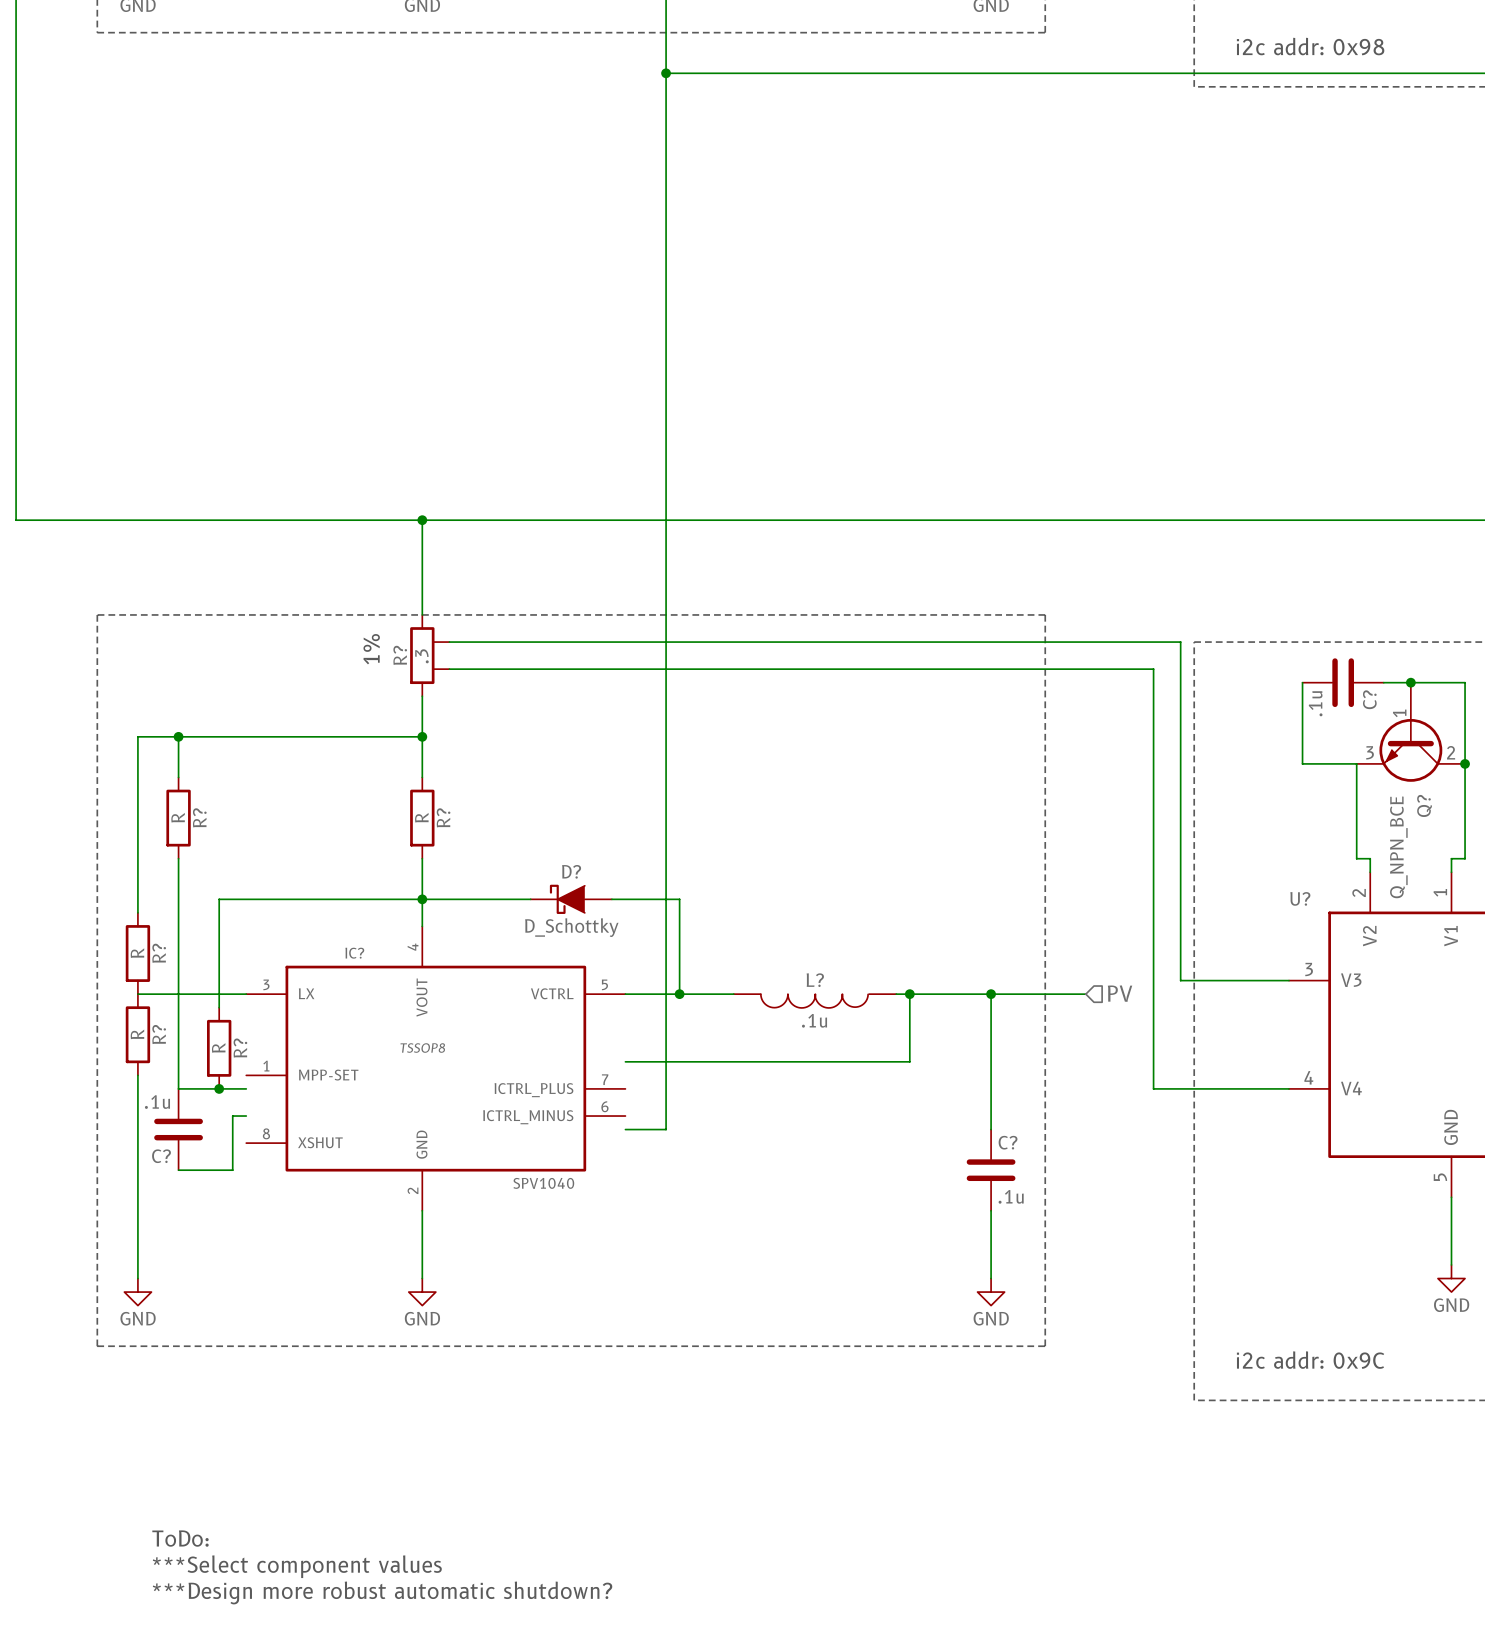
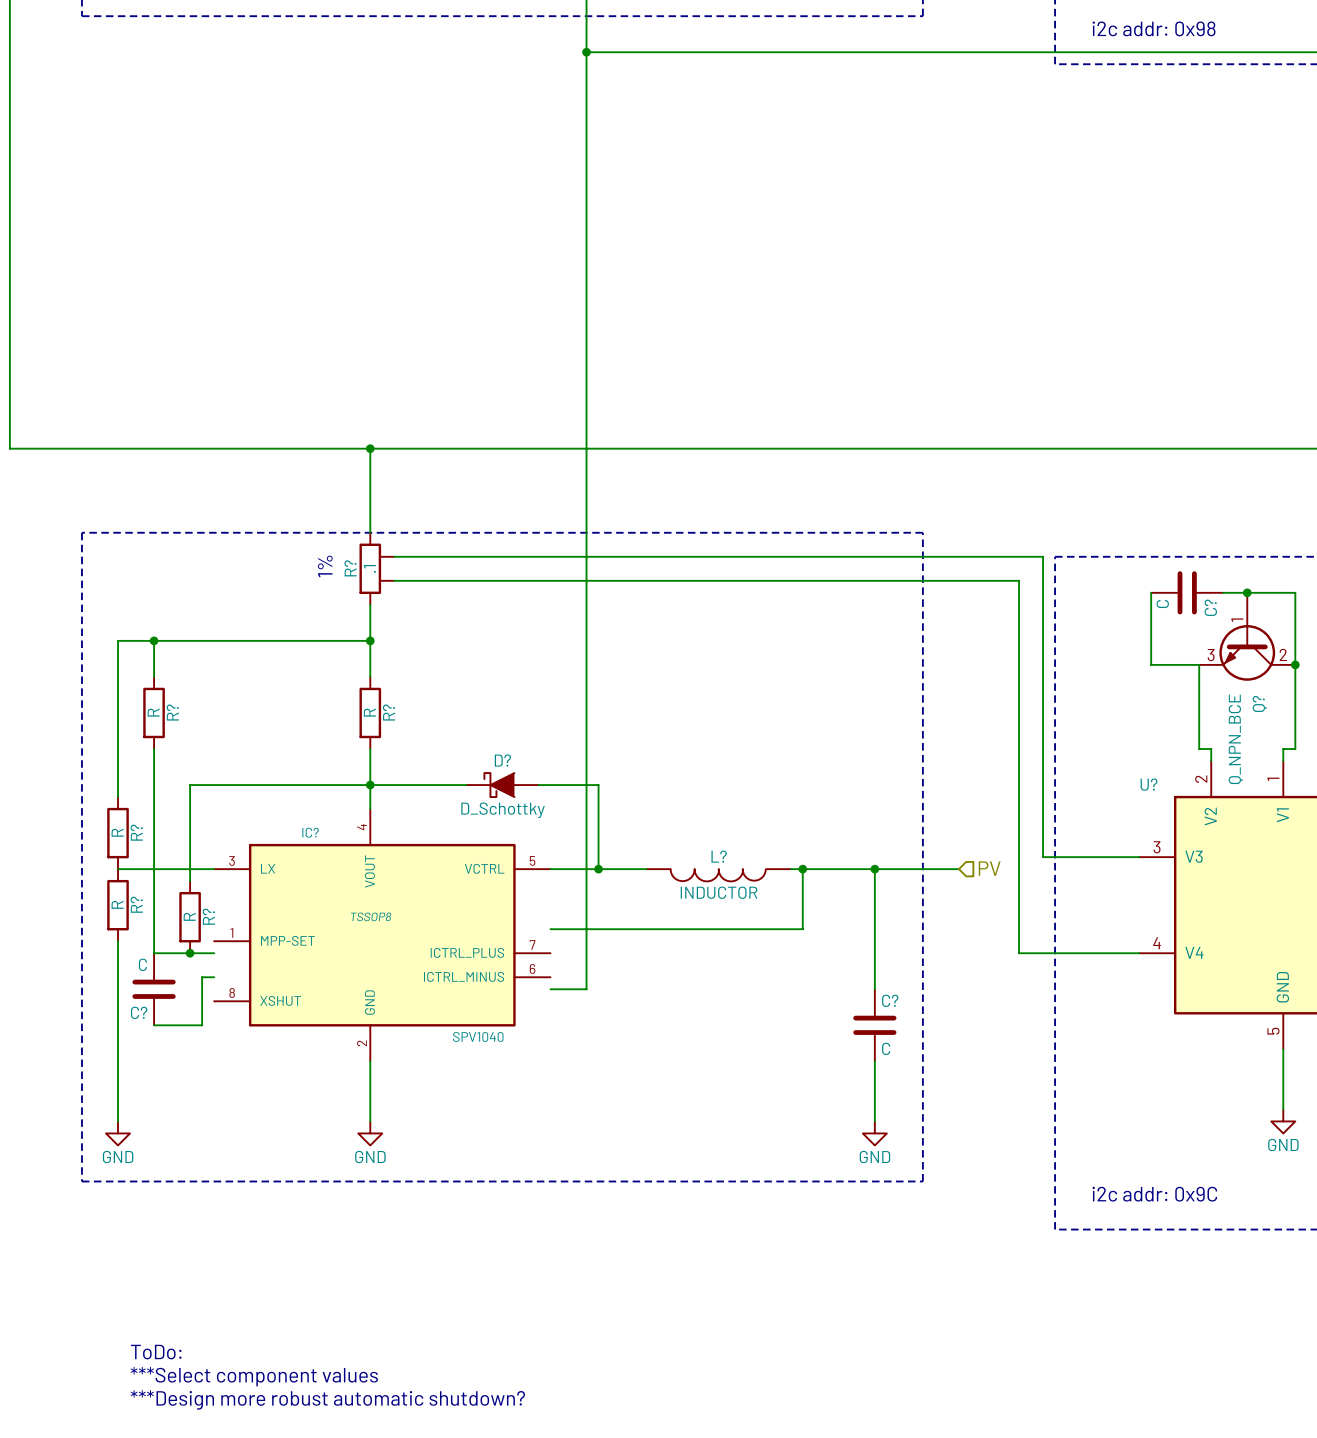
R? value: .3 (421, 656) -> .1 (369, 568)
C? value: .1u (1315, 703) -> C (1162, 603)
L? value: .1u (814, 1020) -> INDUCTOR (719, 892)
C? value: .1u (157, 1102) -> C (142, 964)
C? value: .1u (1011, 1196) -> C (886, 1048)

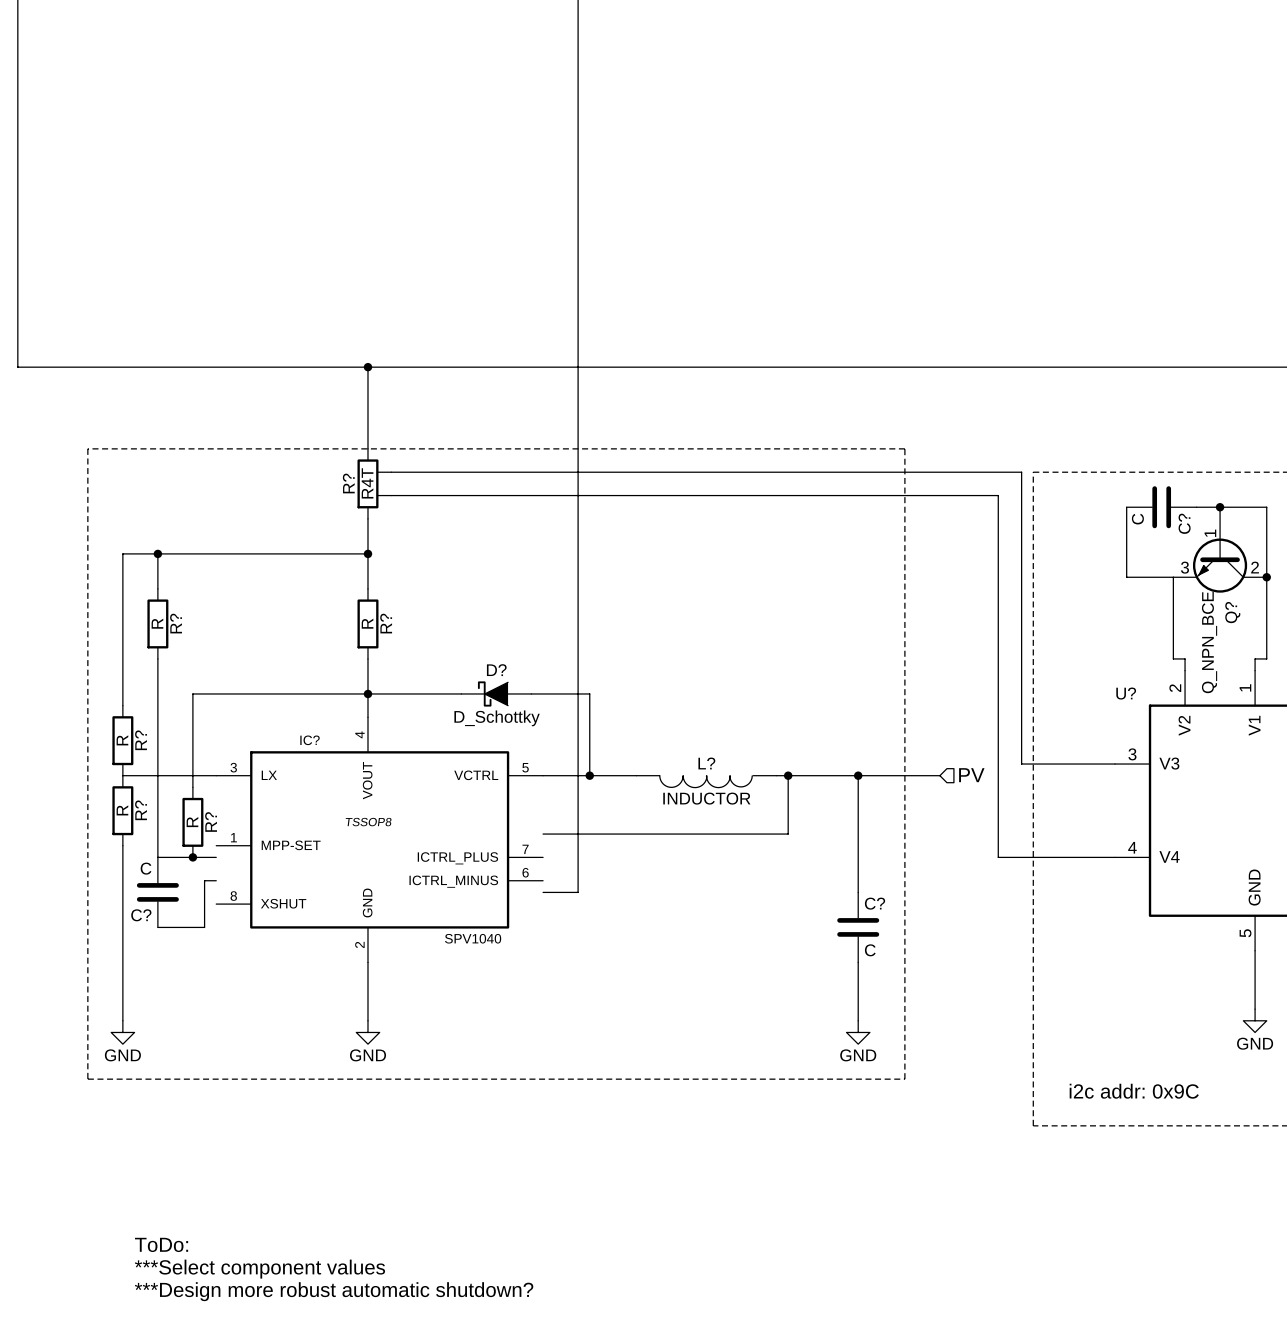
text: 1% (325, 566) -> none
R? value: .1 (369, 568) -> R4T (367, 483)

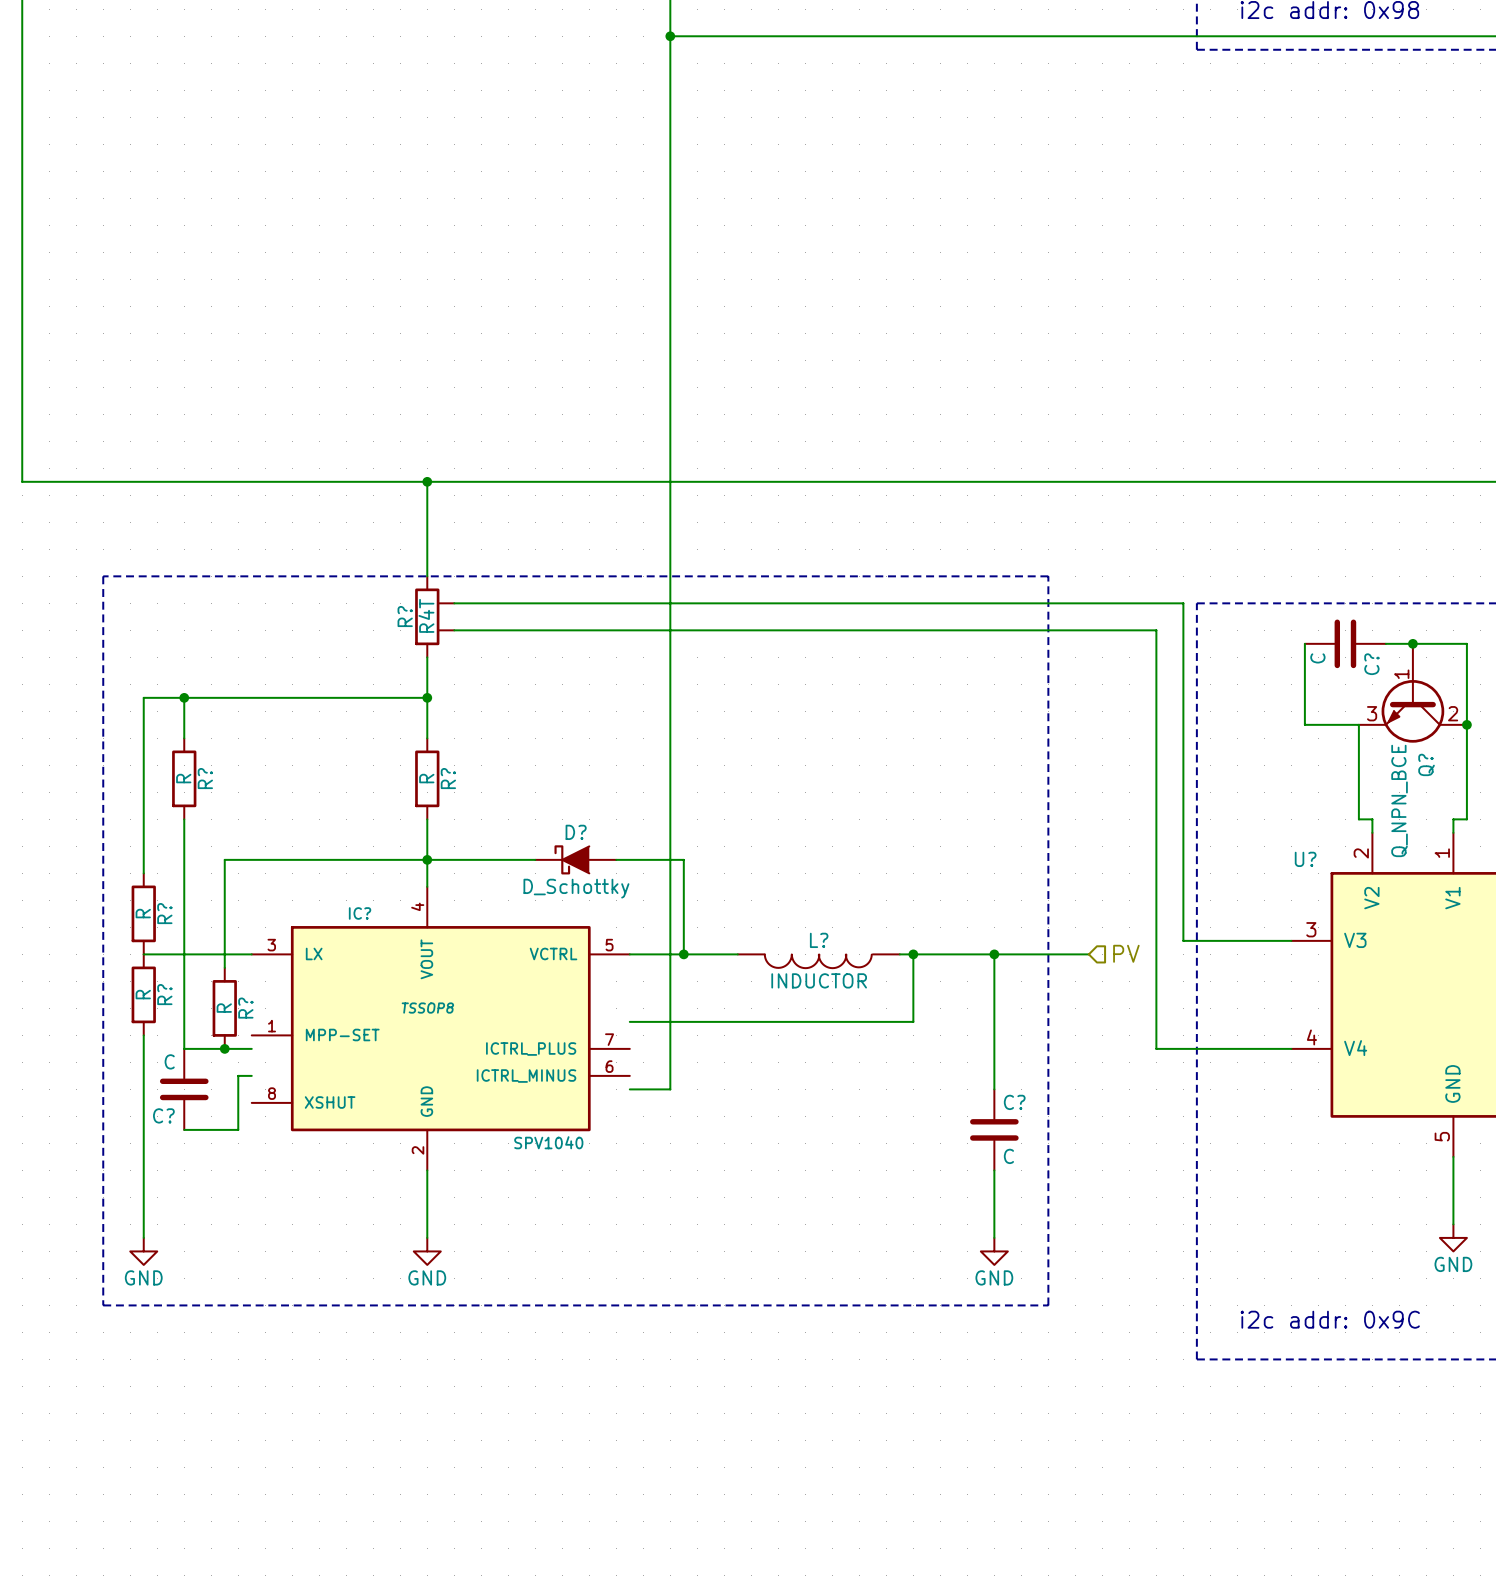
text: ToDo: (161, 1244) -> none
text: ***Select component values (259, 1269) -> none
text: ***Design more robust automatic shutdown? (334, 1291) -> none

